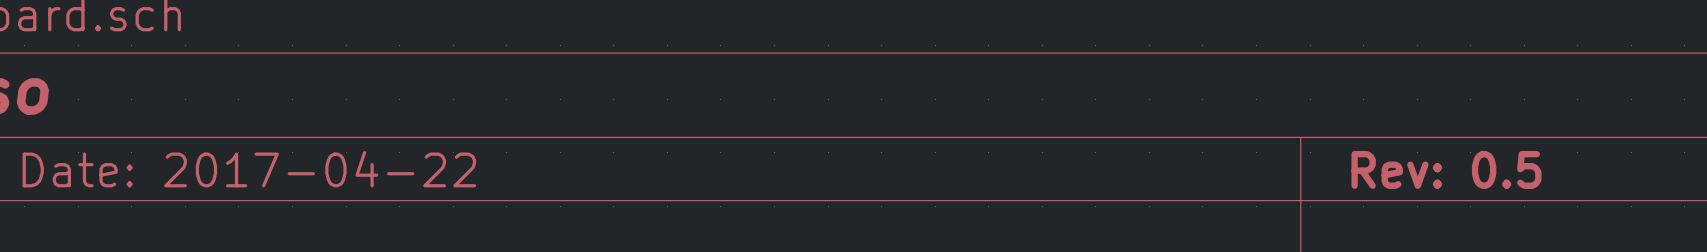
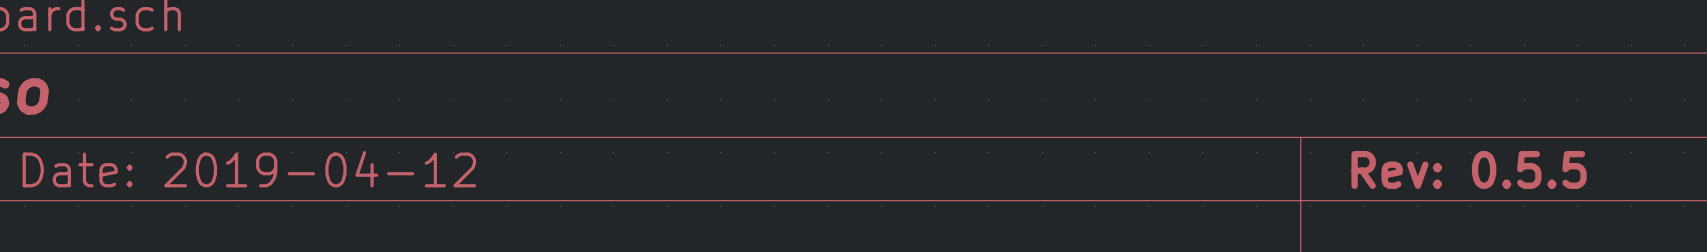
title block: Date: 2017-04-22 (249, 169) -> Date: 2019-04-12 (249, 169)
title block: Rev: 0.5 (1446, 169) -> Rev: 0.5.5 (1469, 169)

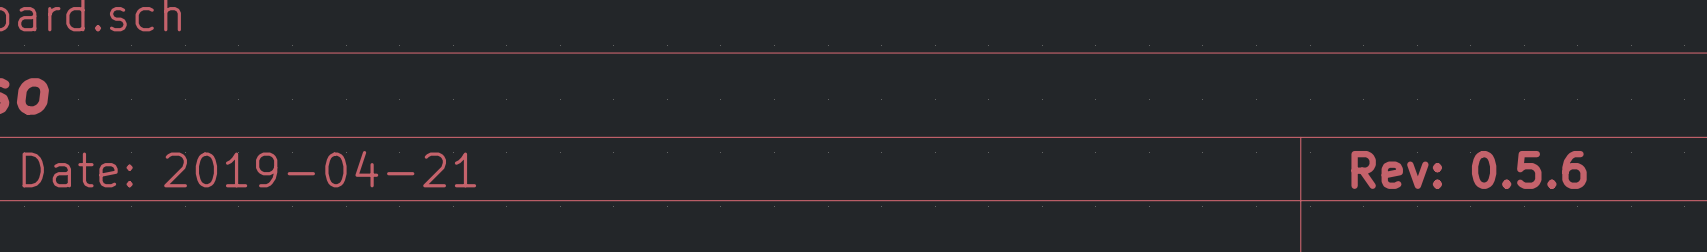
title block: Date: 2019-04-12 (249, 169) -> Date: 2019-04-21 (249, 169)
title block: Rev: 0.5.5 (1469, 169) -> Rev: 0.5.6 (1469, 169)

